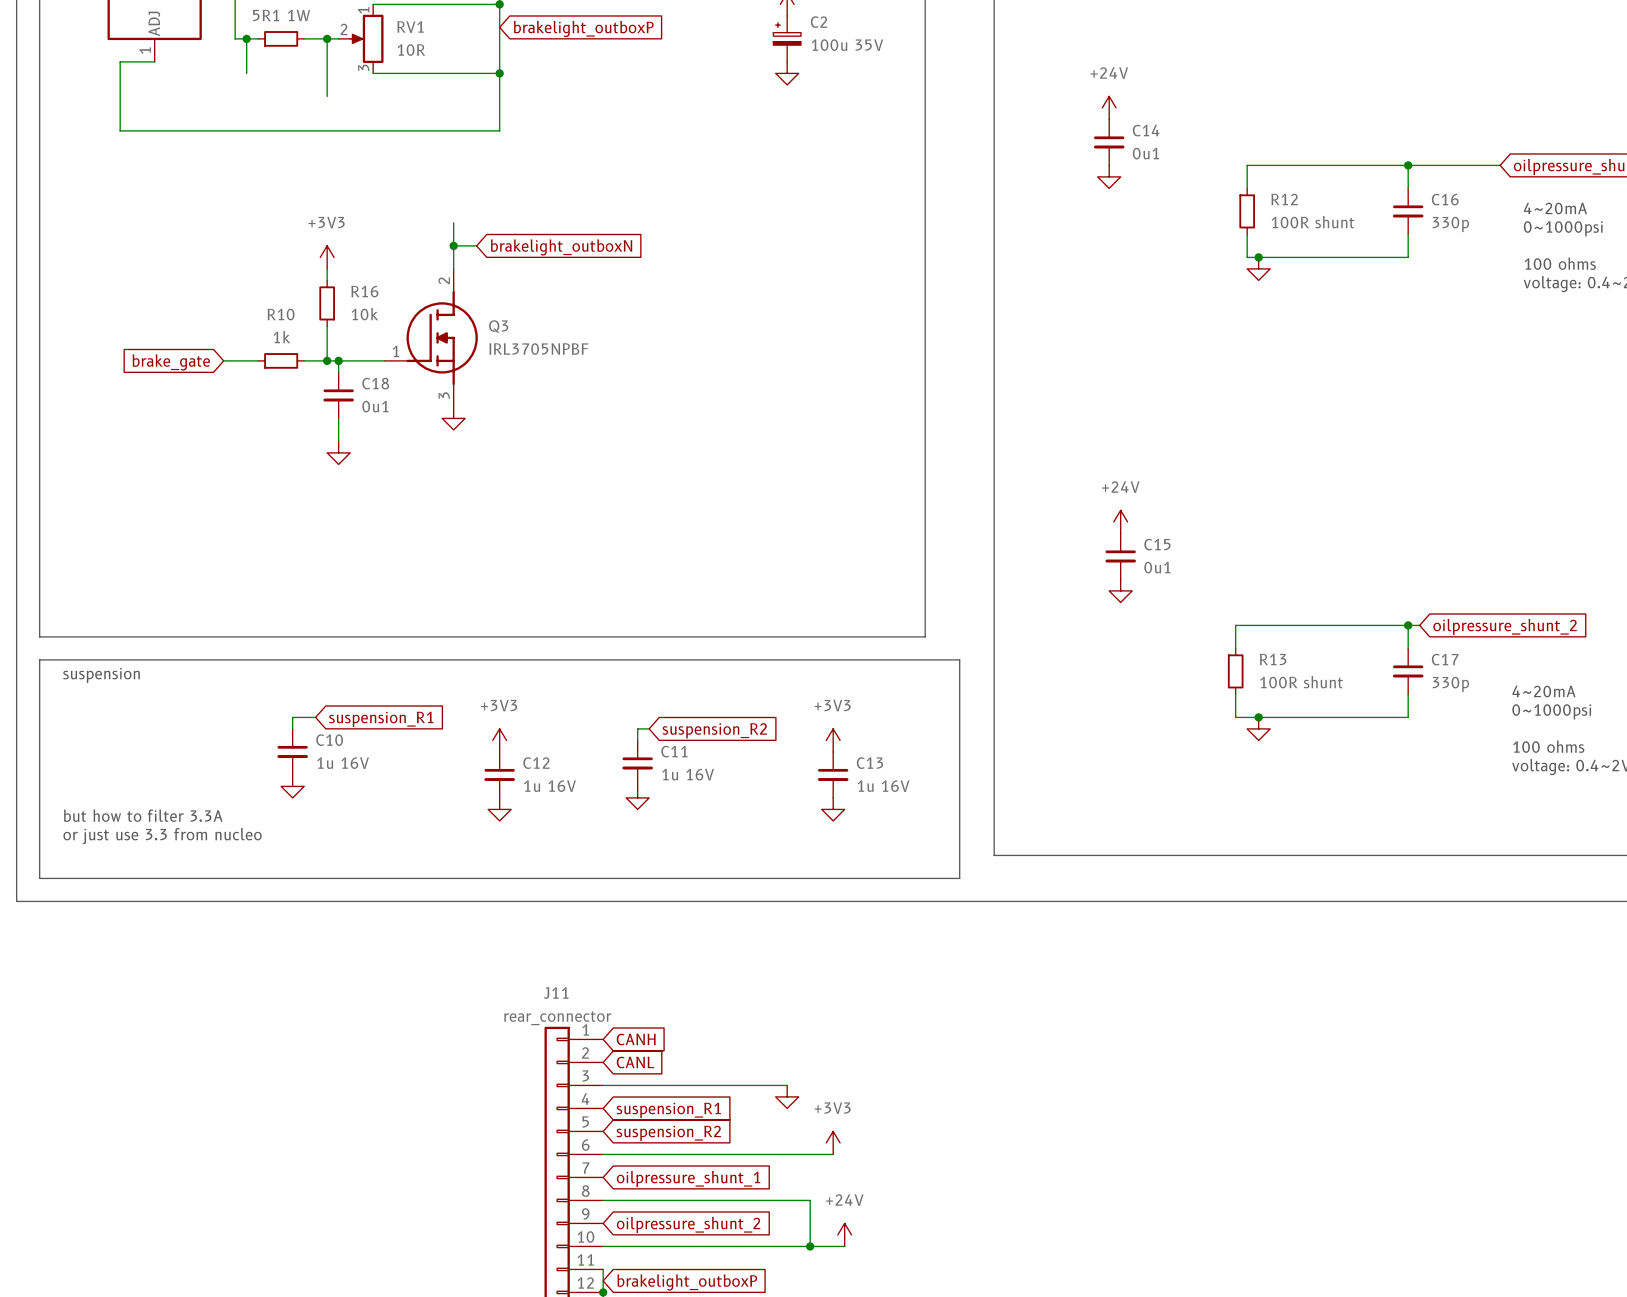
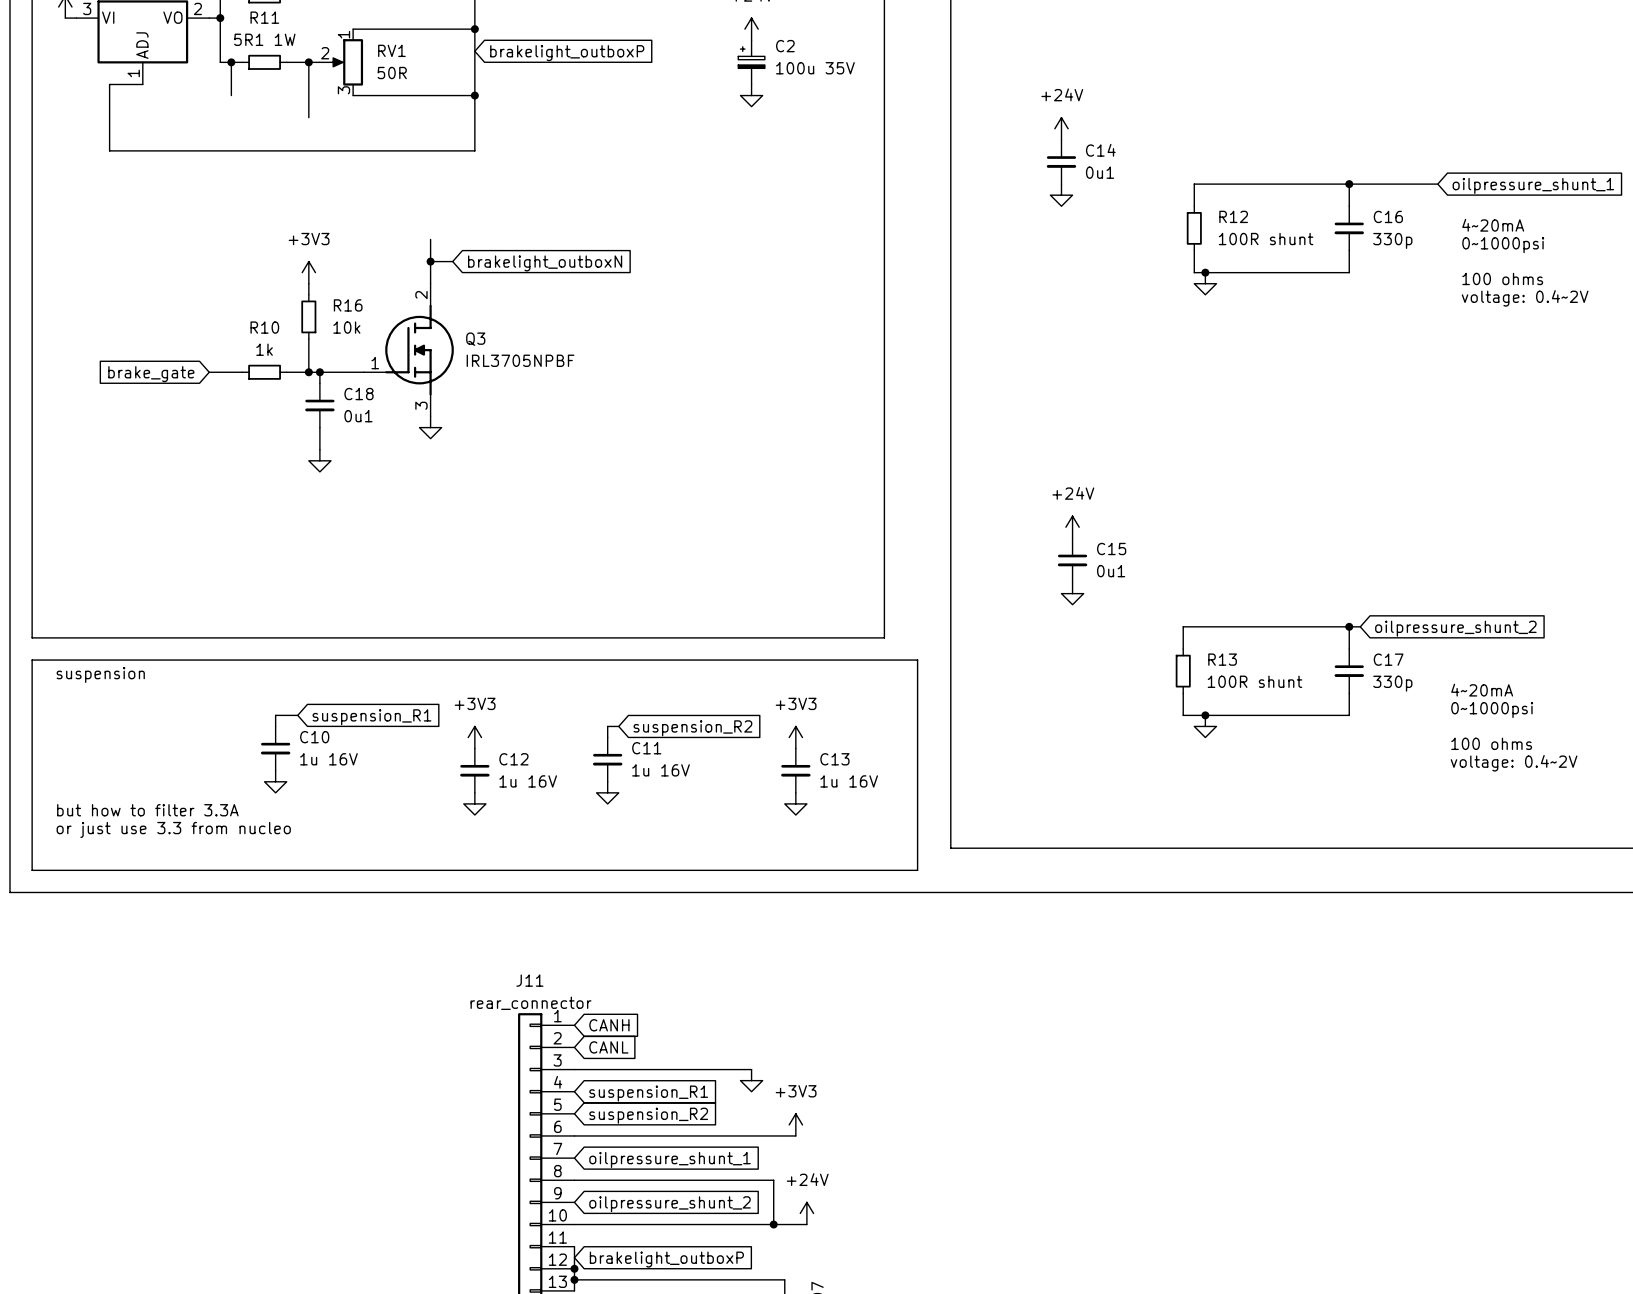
RV1 value: 10R (411, 50) -> 50R (392, 73)

